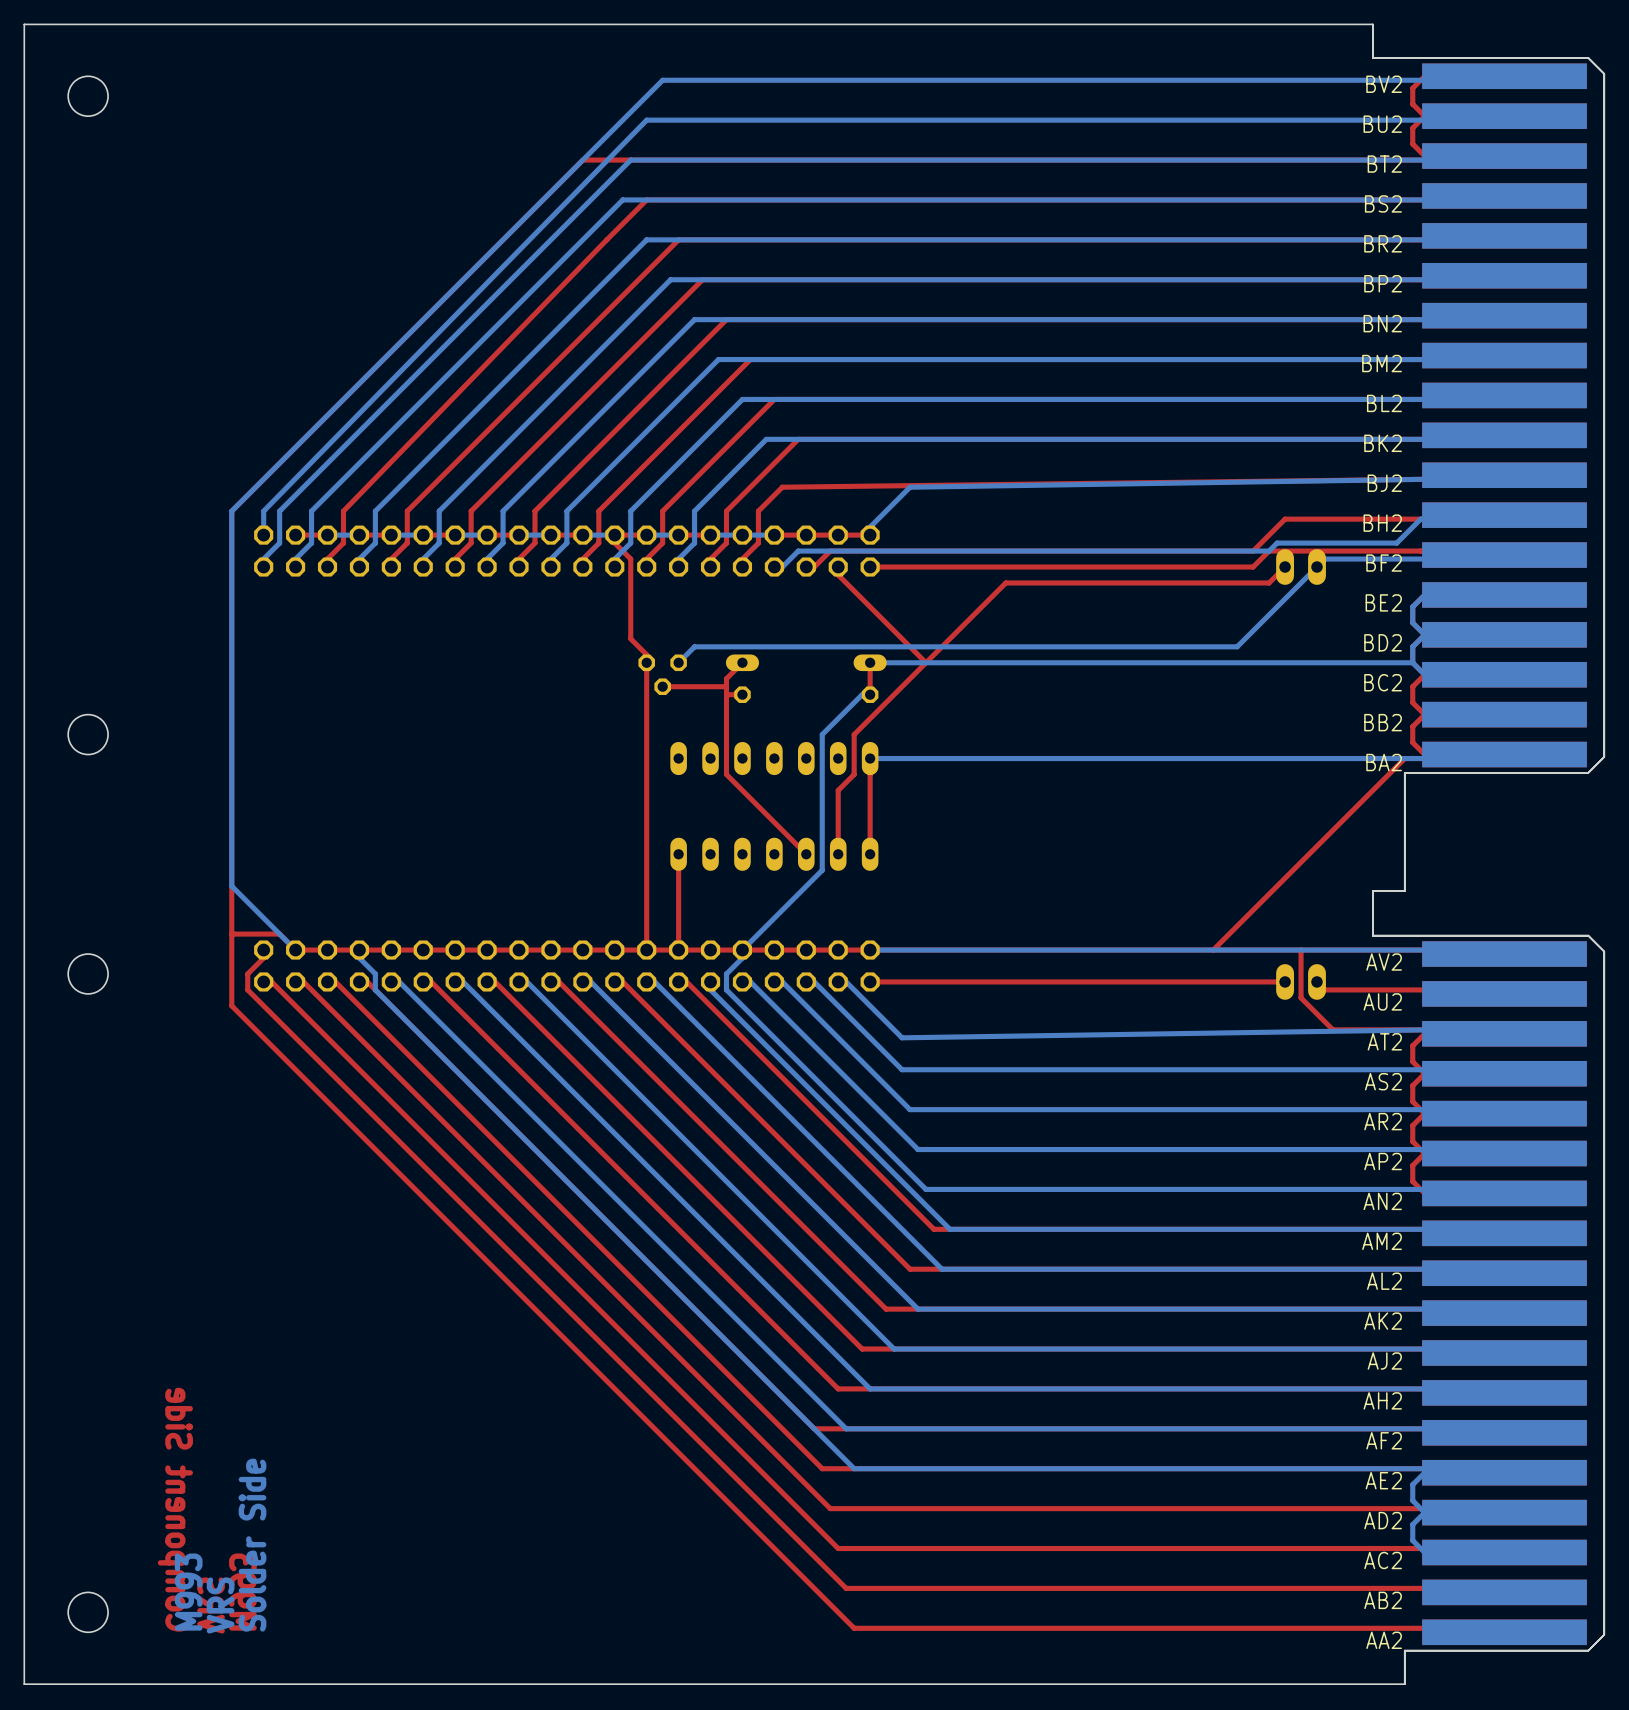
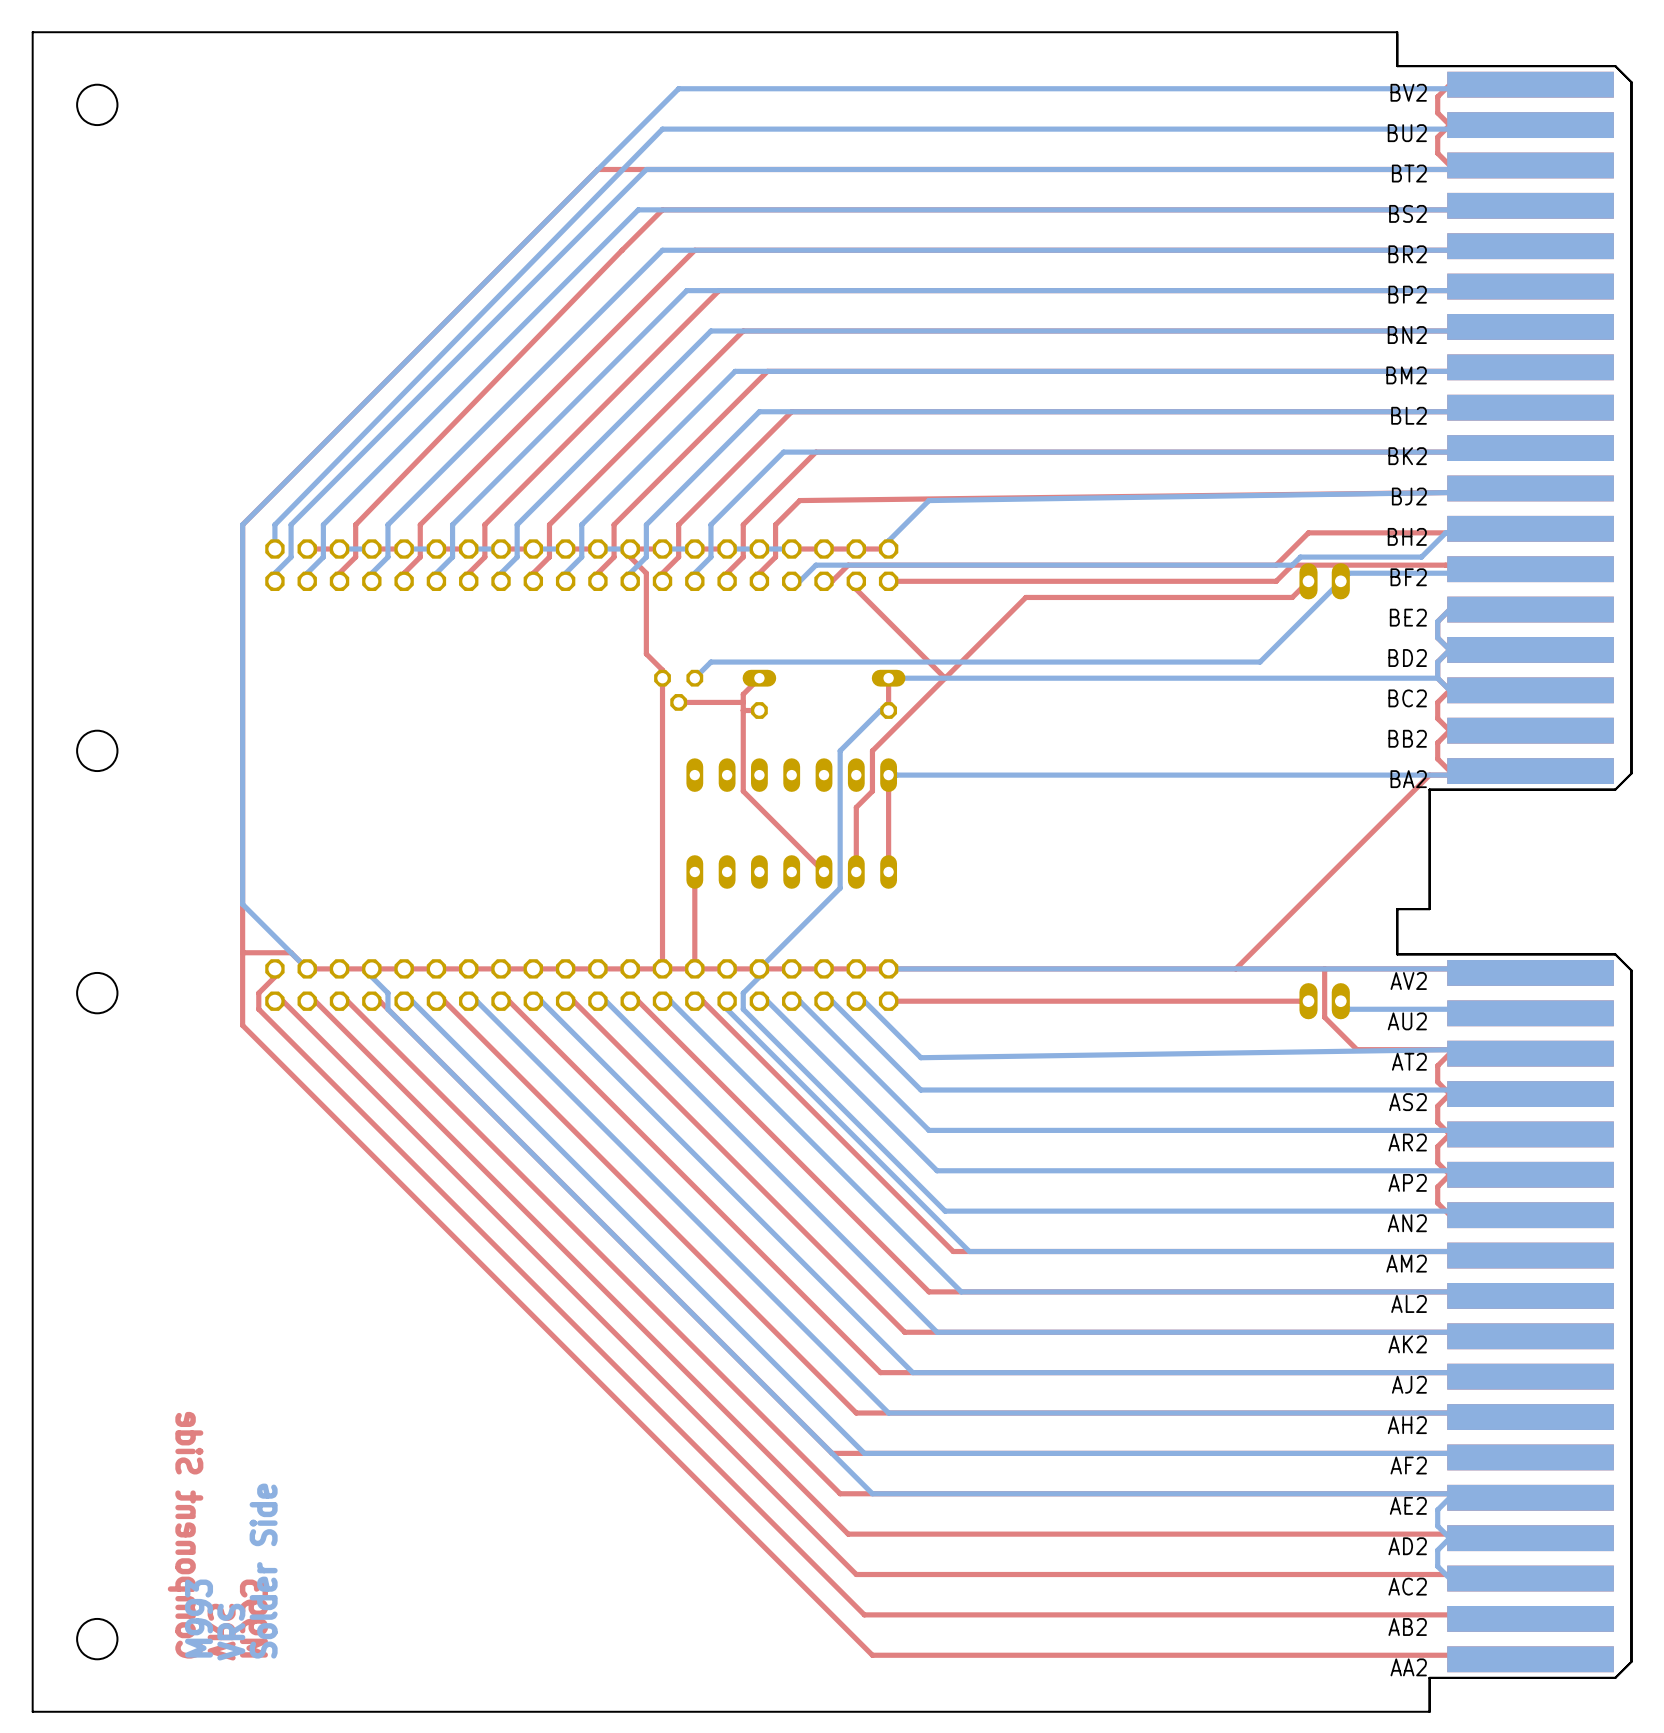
top track: (1317, 981) (1324, 989) (1428, 989) (1504, 993) -> none
bottom track: none -> (1340, 1001) (1348, 1009) (1526, 1009) (1530, 1013)

